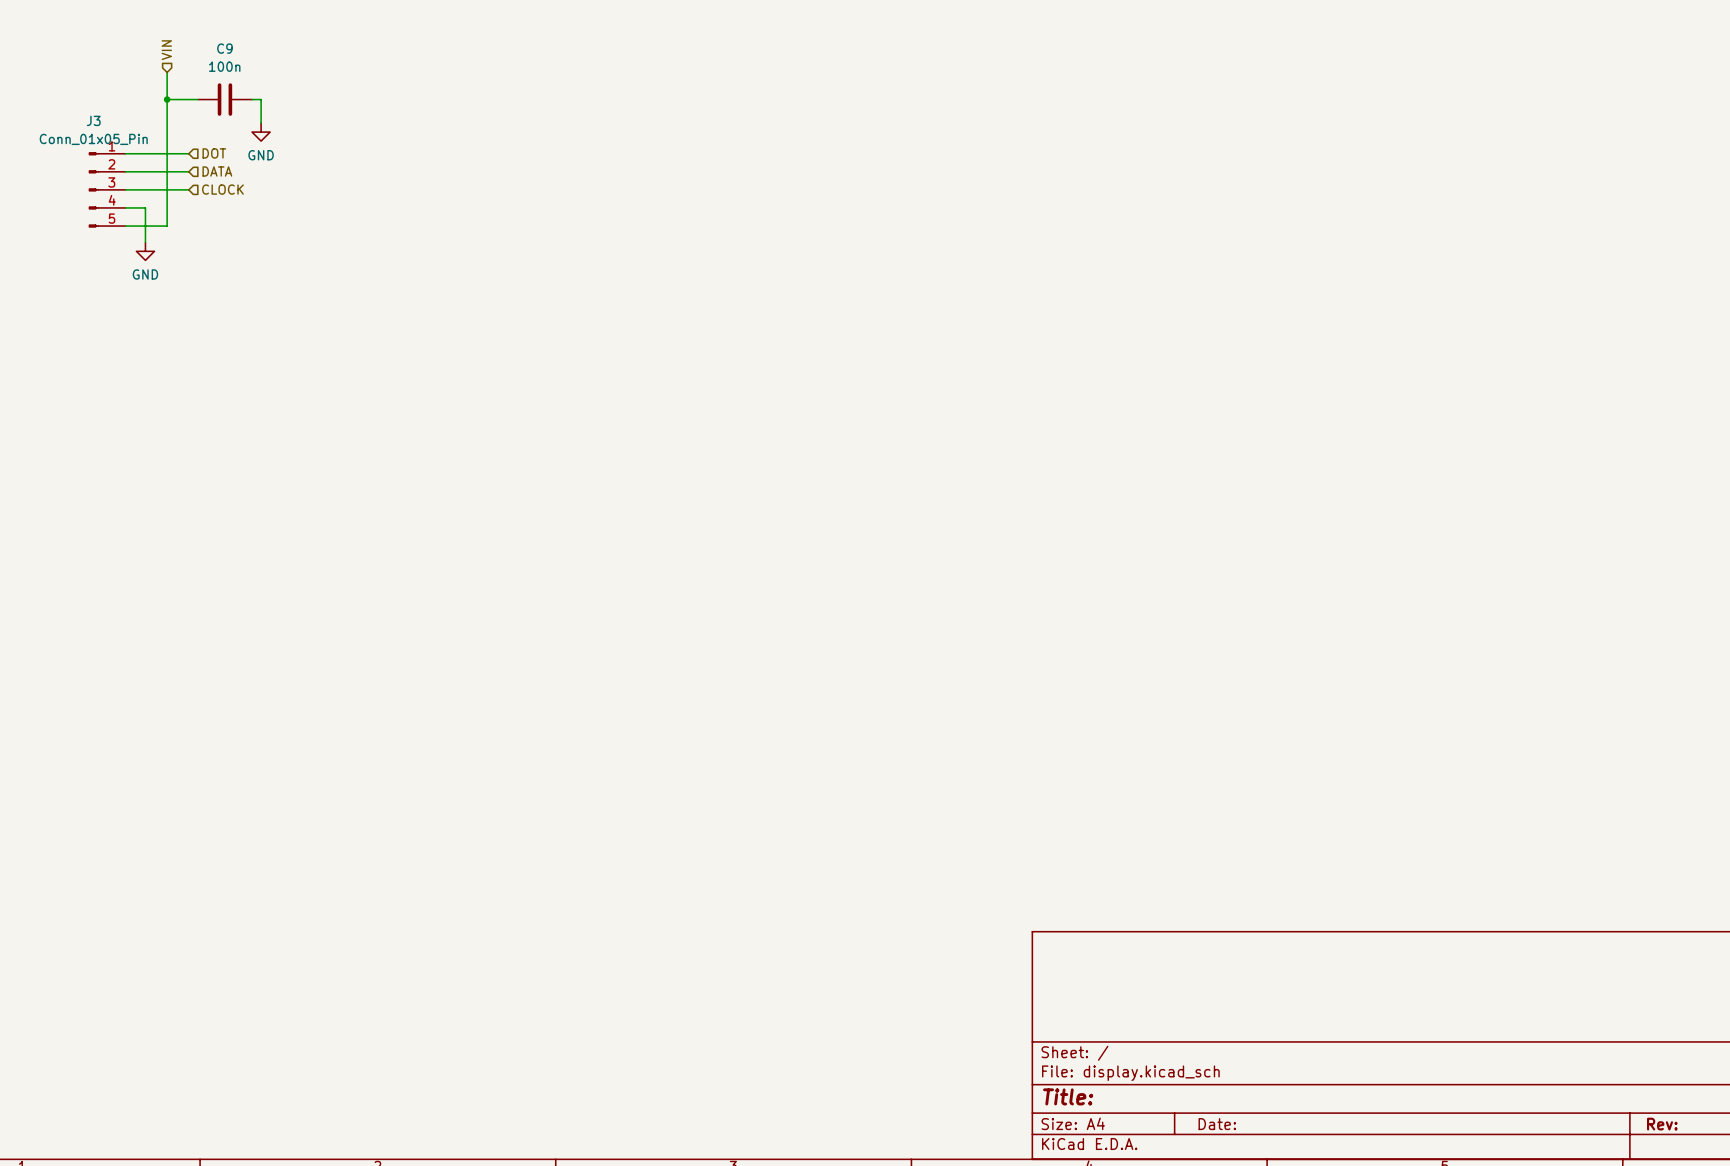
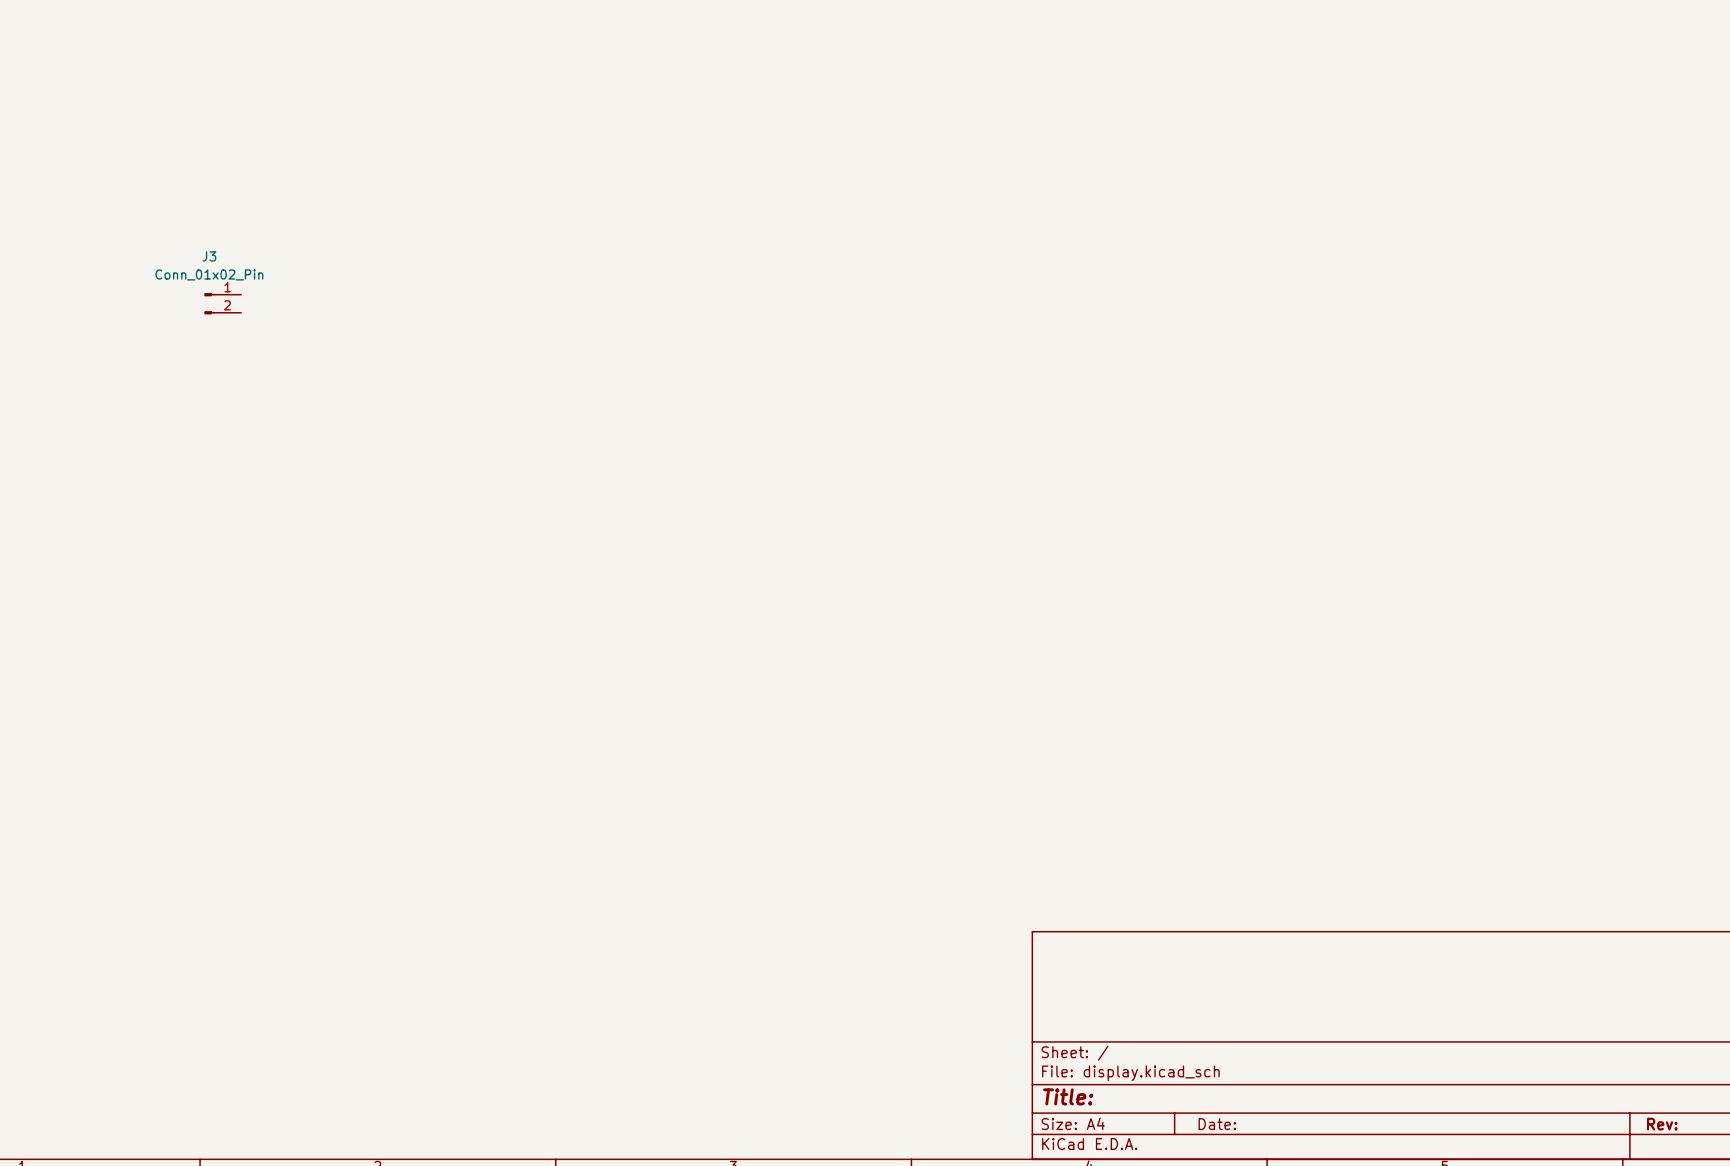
hierarchical label: VIN (166, 50) -> none
wire: (167, 72) (167, 226) (125, 226) -> none
wire: (167, 99) (197, 99) -> none
junction: (167, 99) -> none
C9: 100n (224, 99) -> none
wire: (252, 99) (261, 99) (261, 123) -> none
J3 name position: J3 (93, 120) -> J3 (209, 256)
power symbol: GND (261, 132) -> none
J3 value: Conn_01x05_Pin (93, 139) -> Conn_01x02_Pin (209, 274)
J3 symbol: [88, 152, 126, 228] -> [204, 293, 242, 315]
wire: (125, 153) (188, 153) -> none
hierarchical label: DOT (214, 153) -> none
wire: (125, 171) (188, 171) -> none
hierarchical label: DATA (217, 171) -> none
wire: (125, 189) (188, 189) -> none
hierarchical label: CLOCK (222, 189) -> none
wire: (125, 207) (145, 207) (145, 242) -> none
power symbol: GND (145, 251) -> none

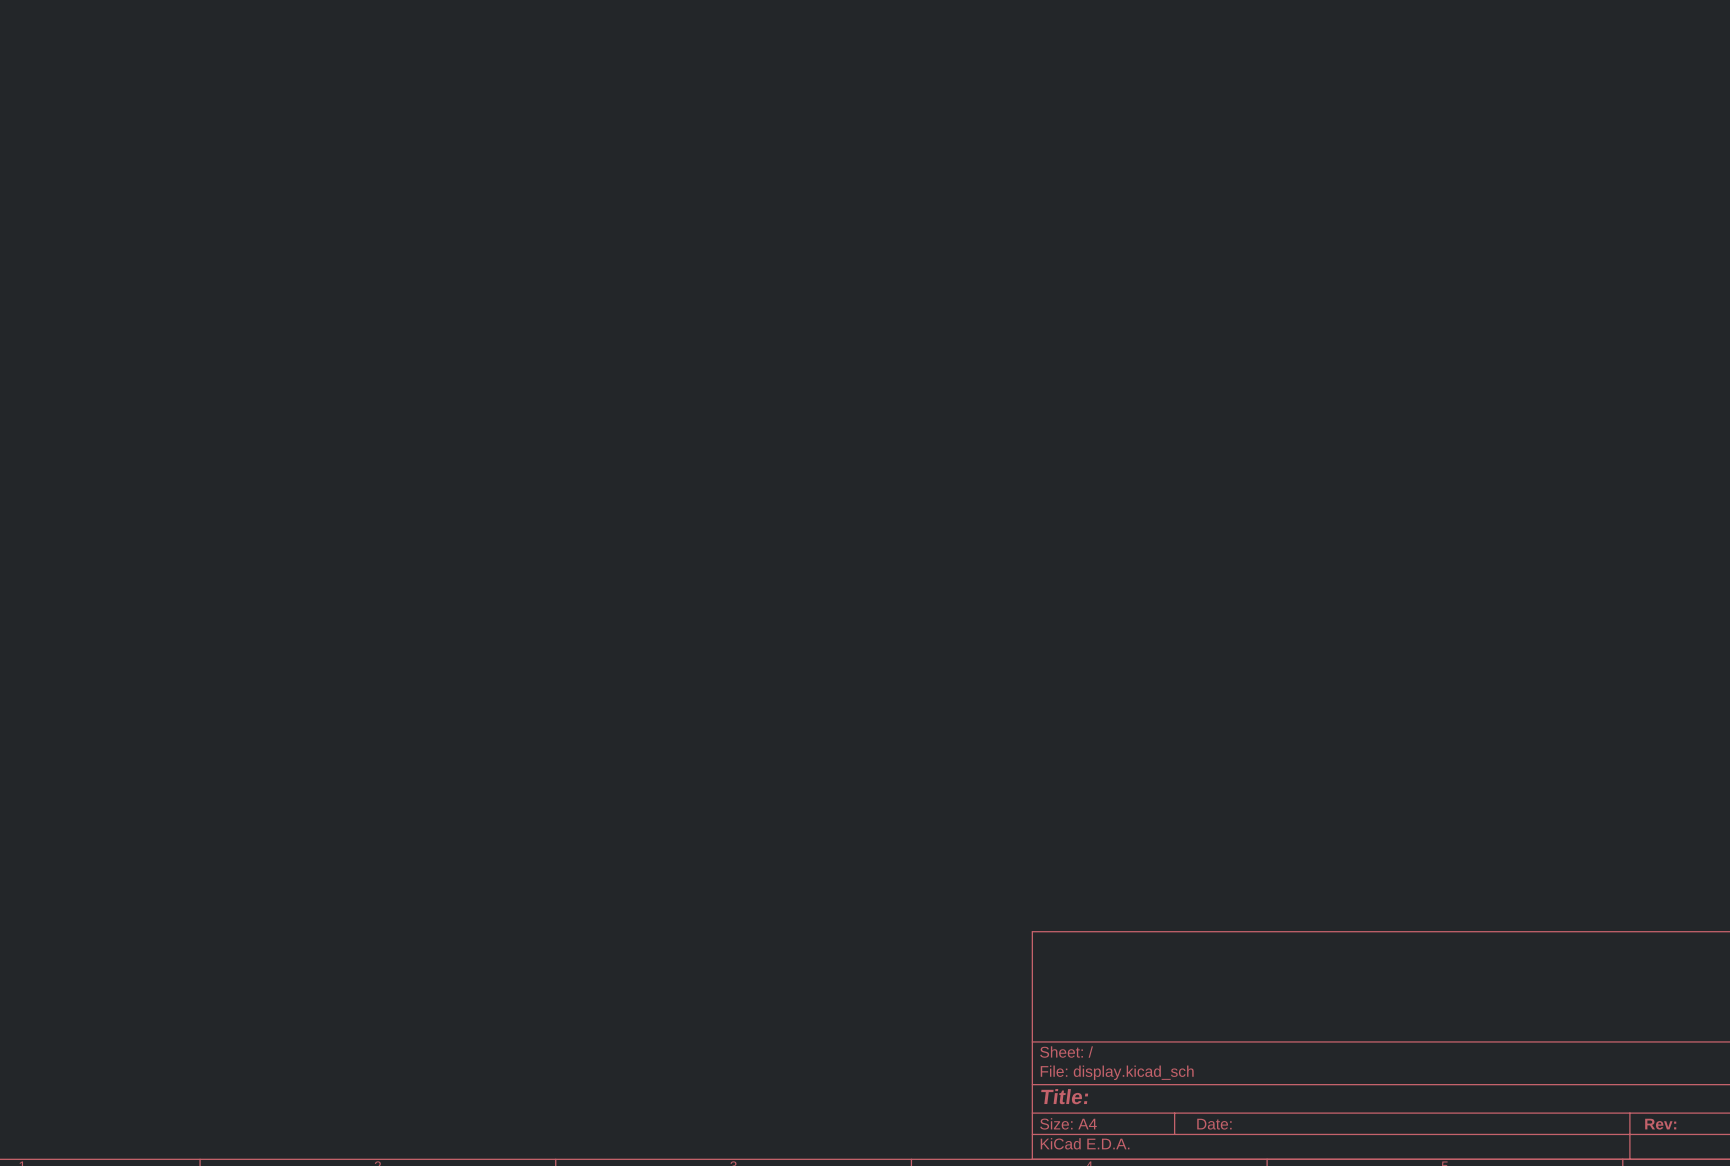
J3: Conn_01x02_Pin (222, 303) -> none

